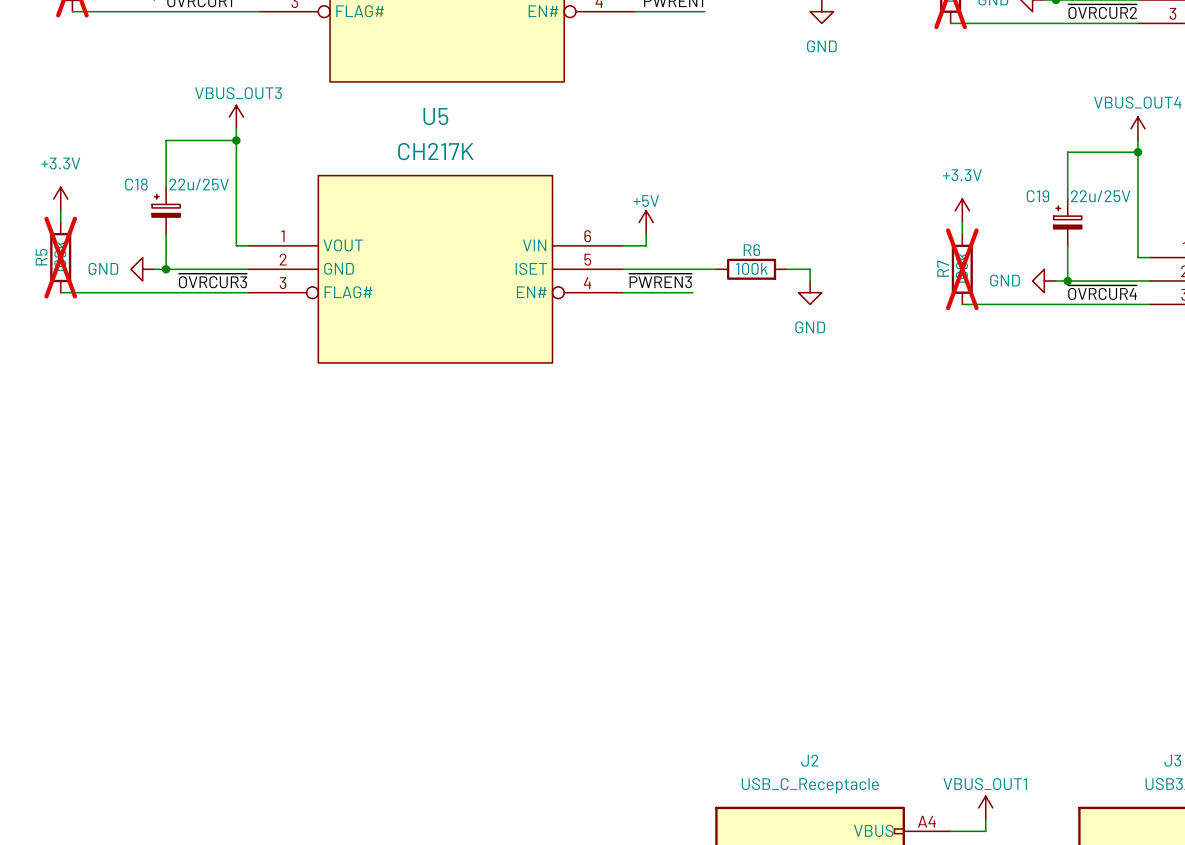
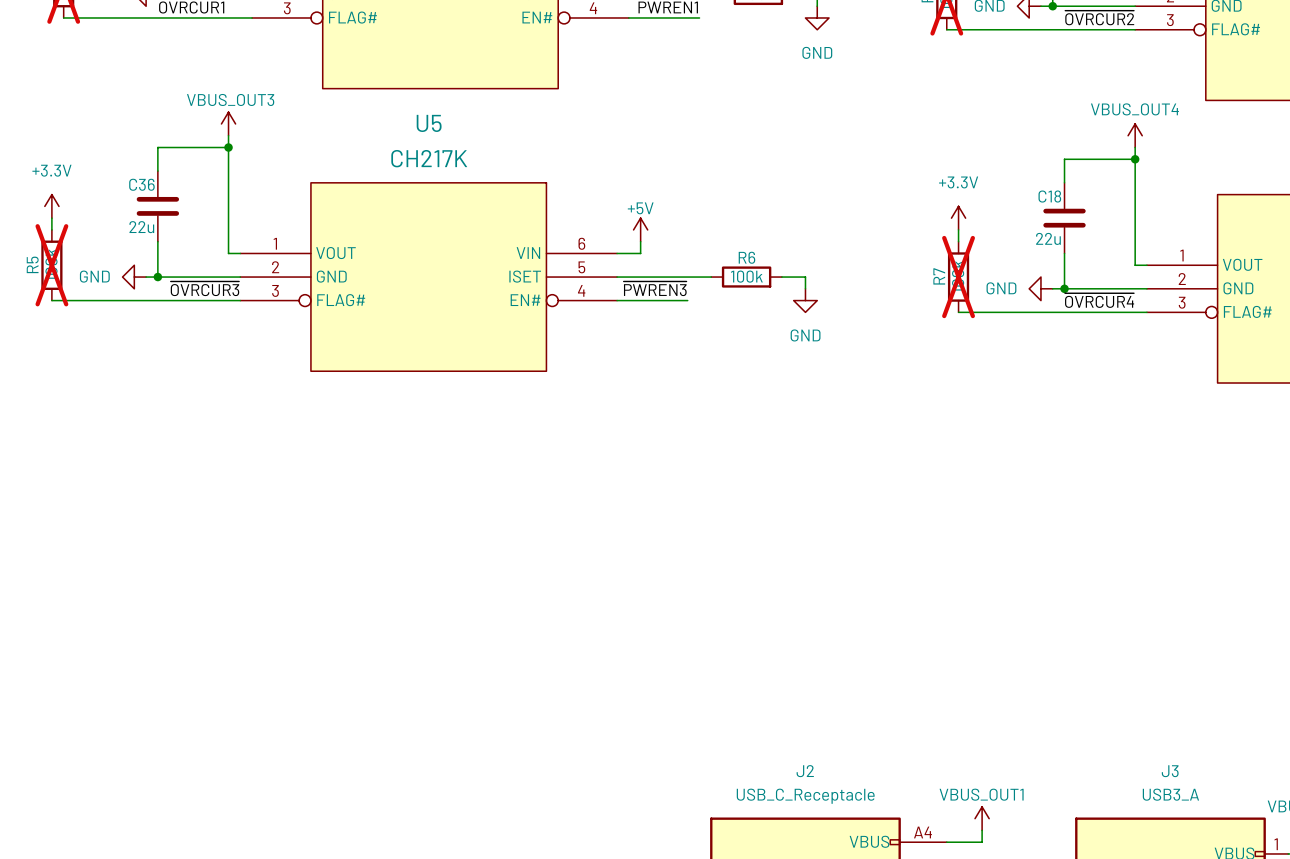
C18 value: 22u/25V (199, 184) -> 22u (1048, 238)
C18 symbol: [152, 187, 181, 235] -> [1043, 182, 1086, 254]
C36: none -> 22u (157, 206)
C19: 22u/25V (1067, 222) -> none

